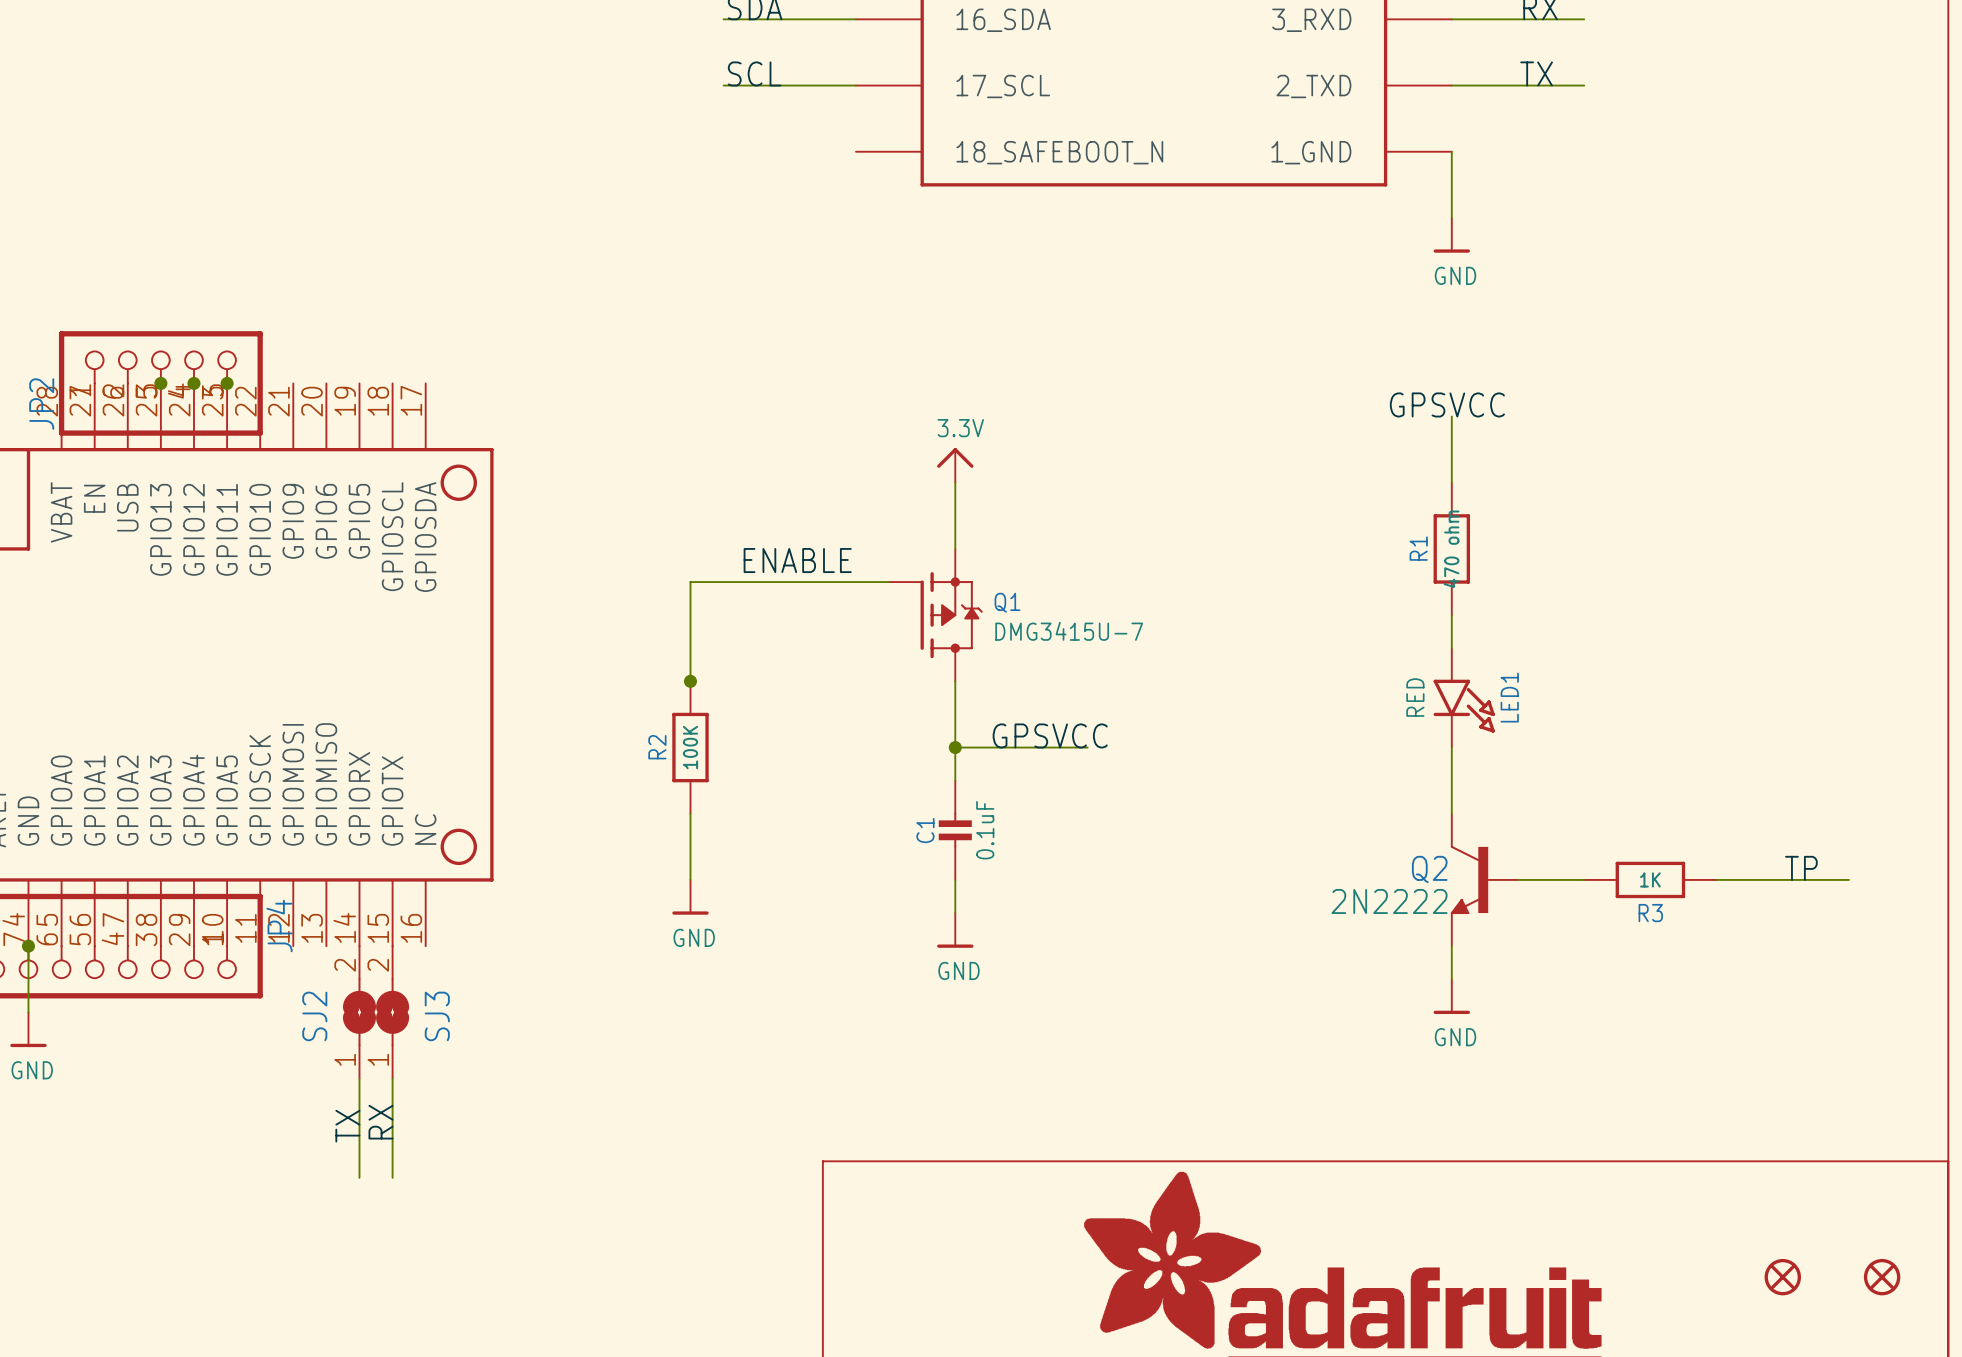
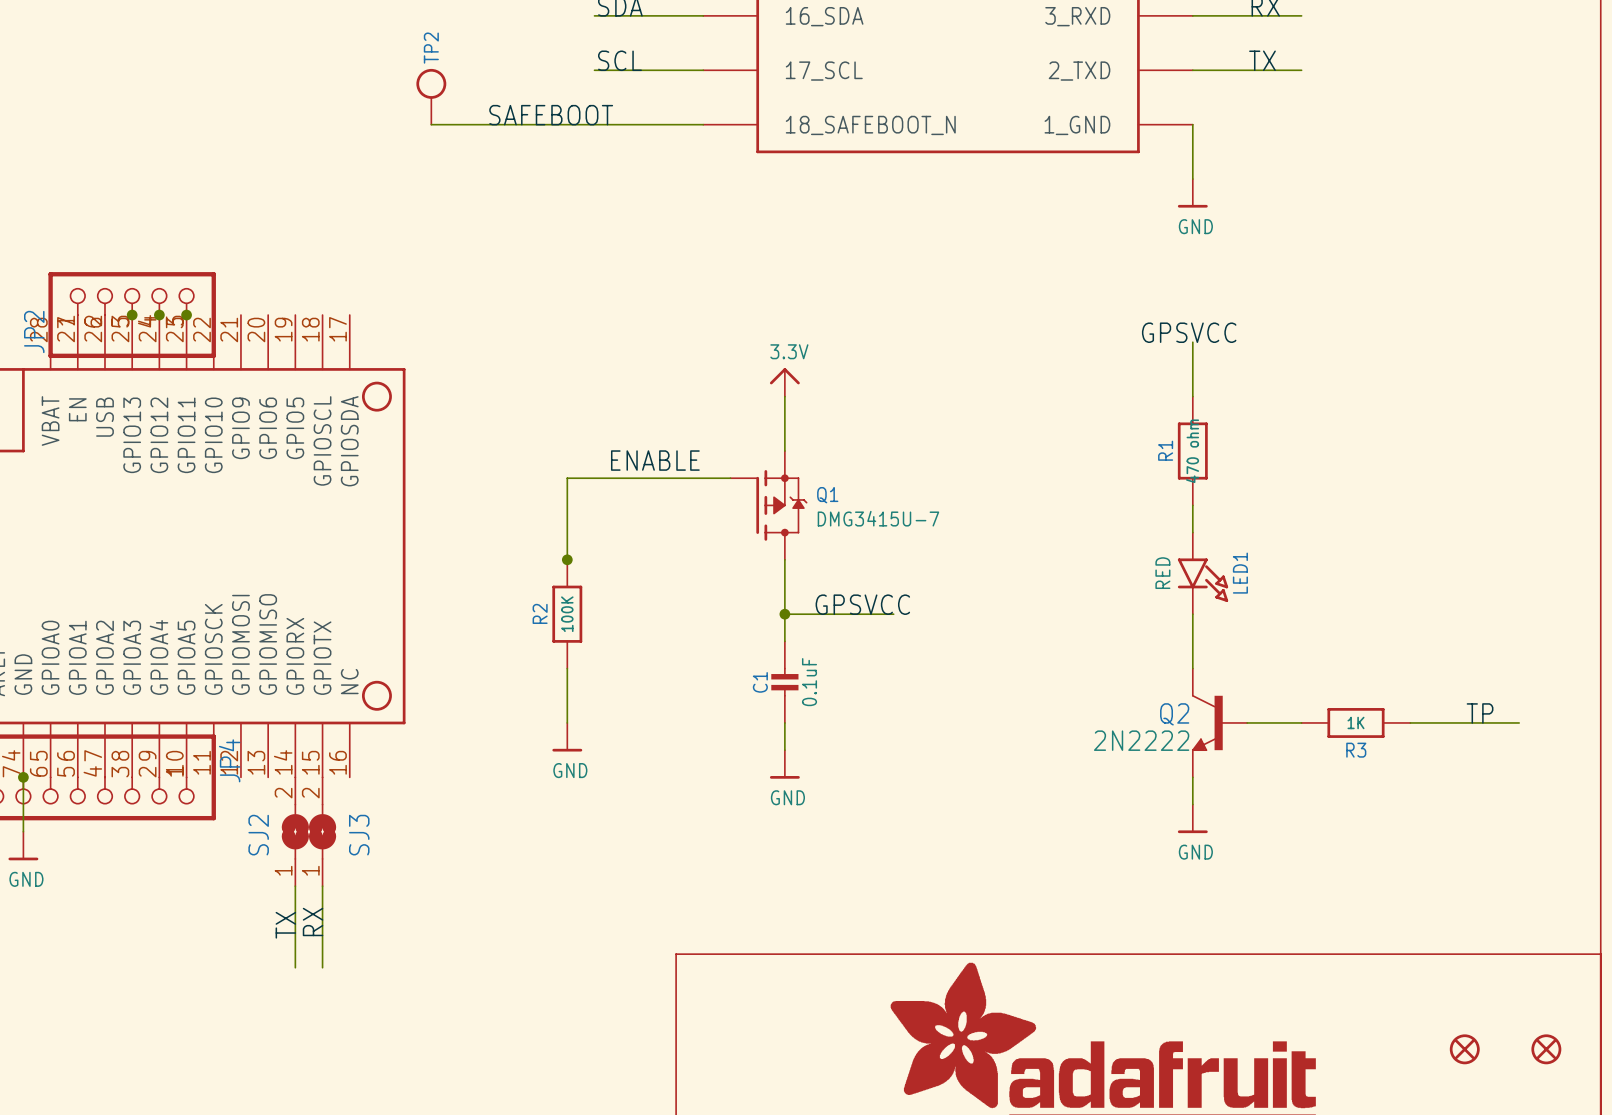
TP2: none -> (431, 96)
label: none -> SAFEBOOT (551, 115)
wire: none -> (431, 124) (703, 124)

